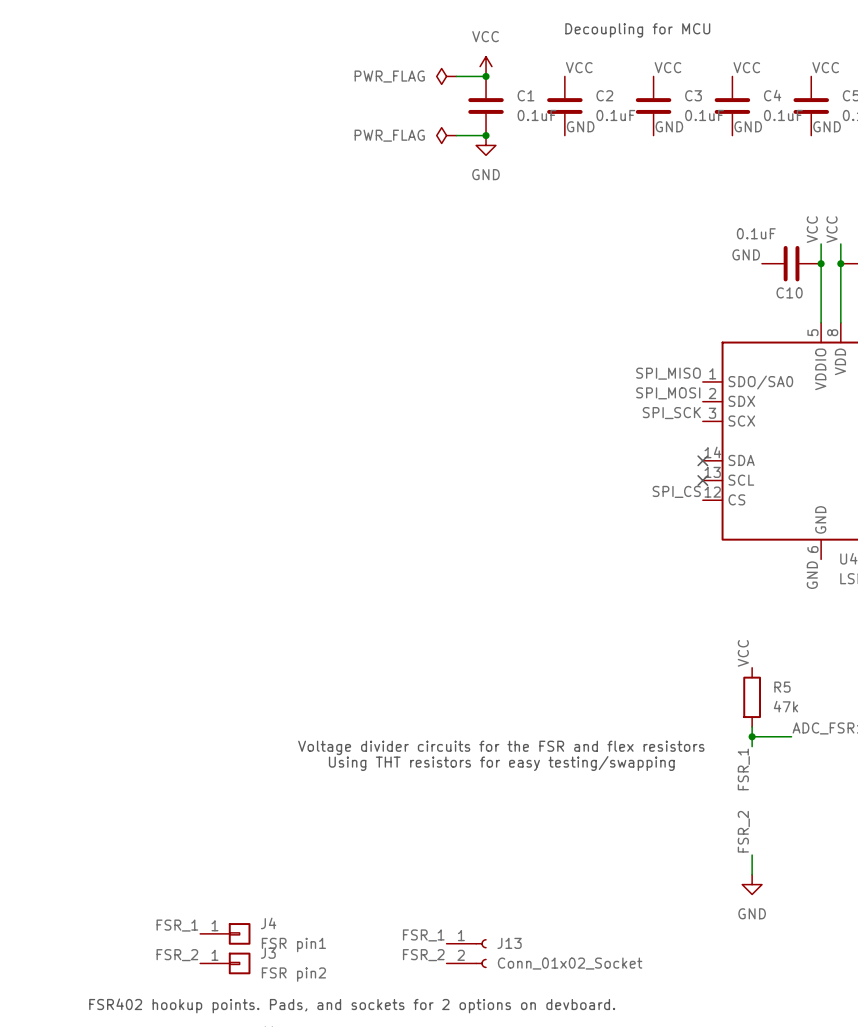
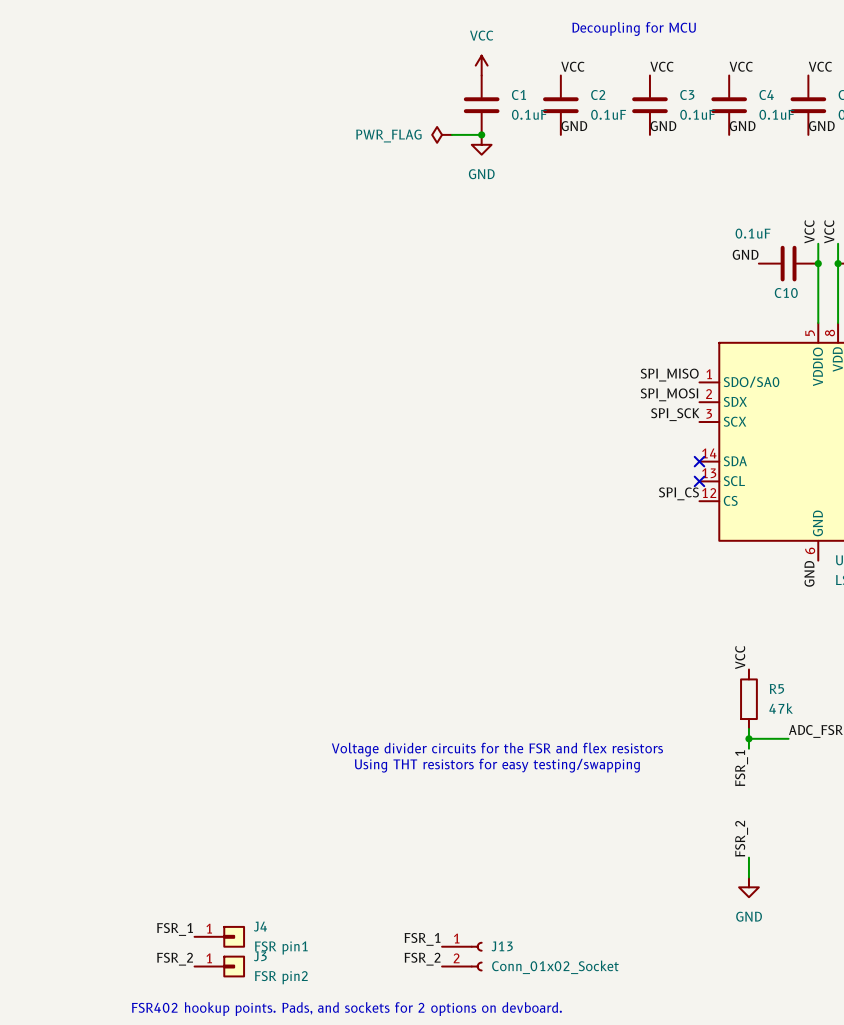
power symbol: PWR_FLAG (446, 76) -> none
wire: (456, 76) (486, 76) -> none
junction: (486, 76) -> none

